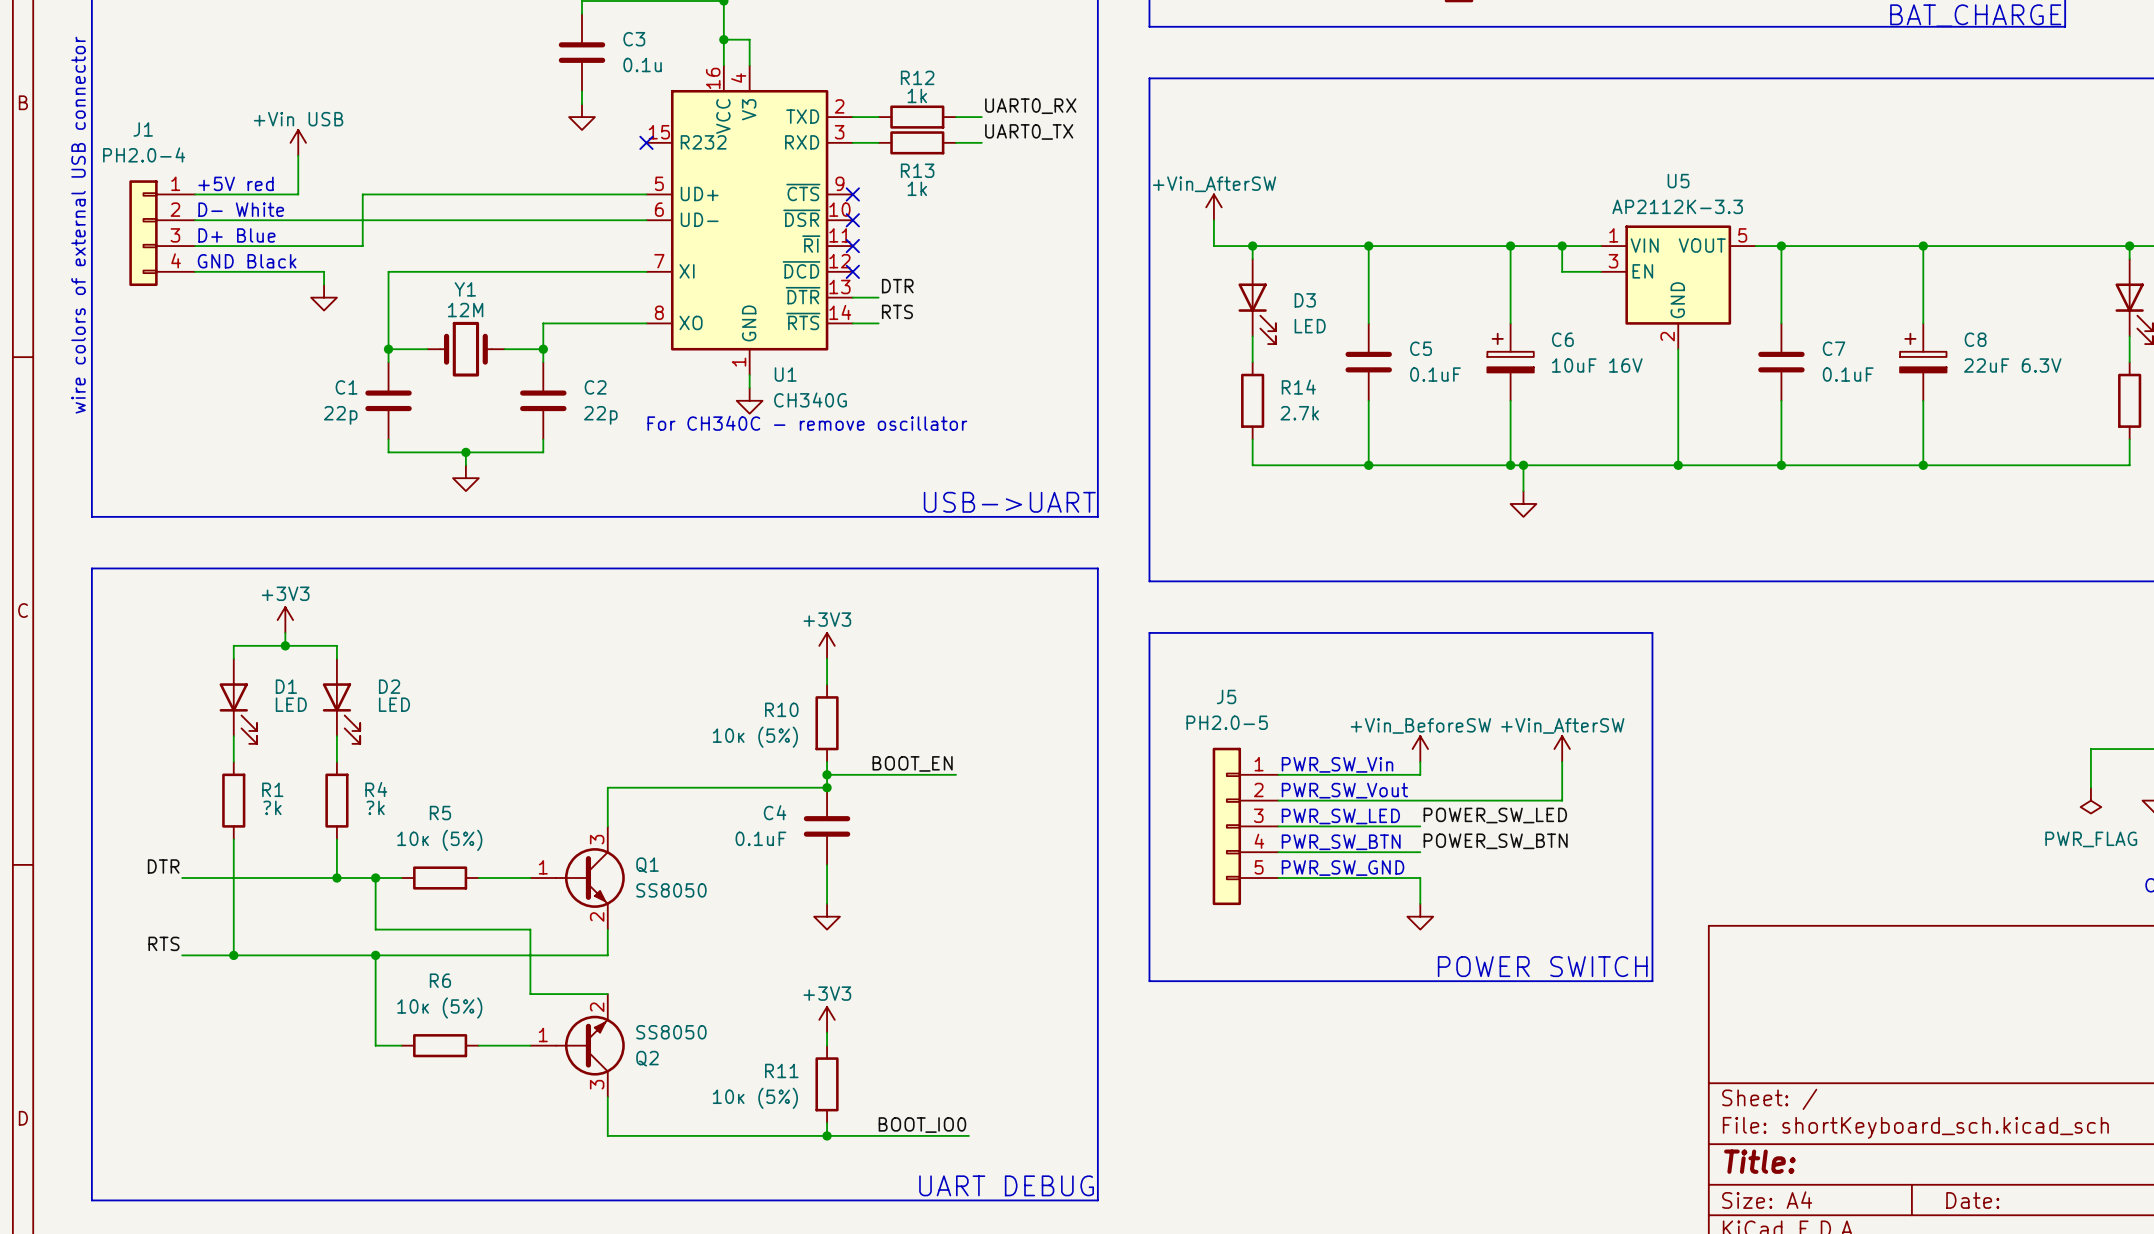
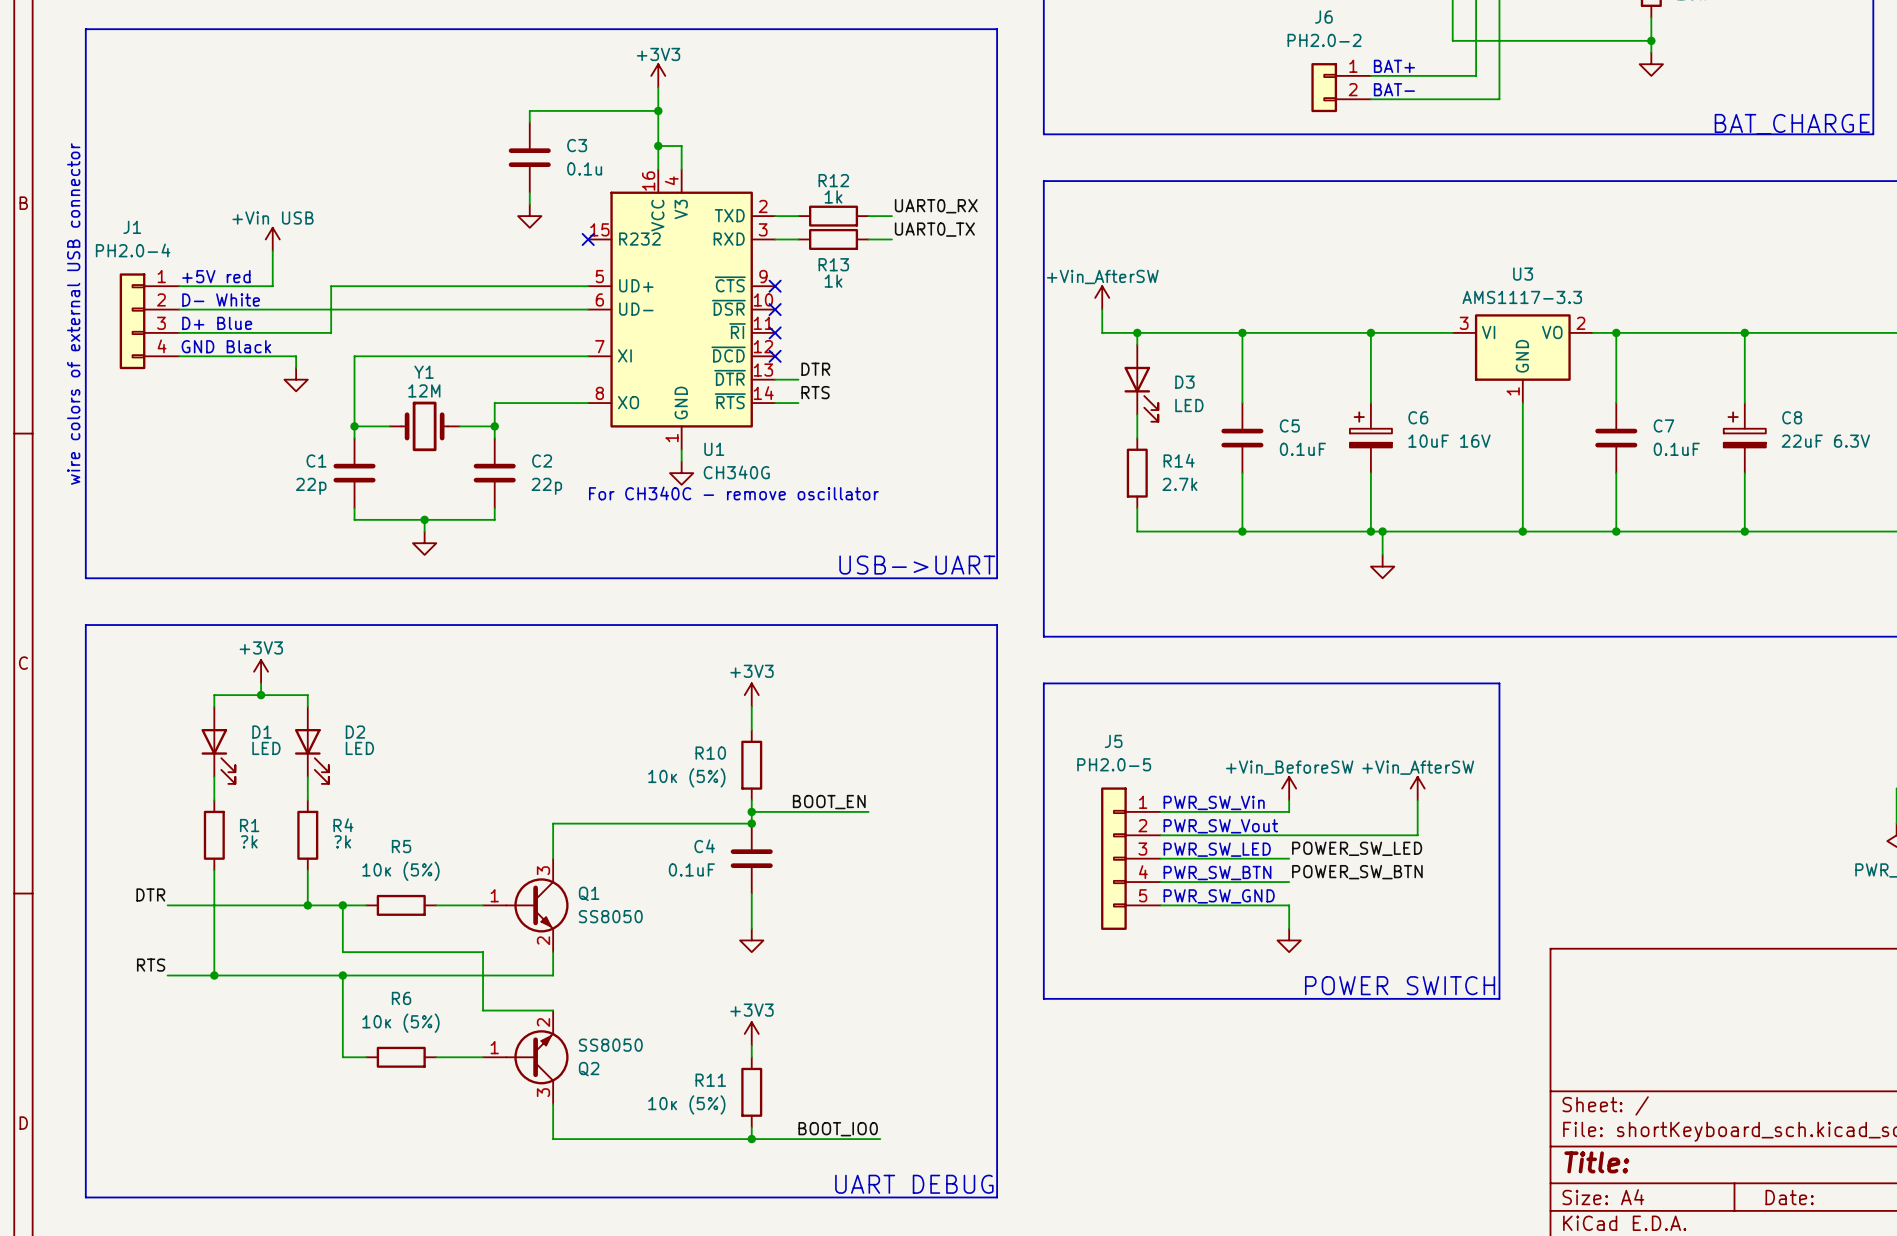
wire: (1562, 246) (1562, 271) (1600, 271) -> none
junction: (1562, 246) -> none
U3: none -> AMS1117-3.3 (1522, 358)
U5: AP2112K-3.3 (1678, 287) -> none

